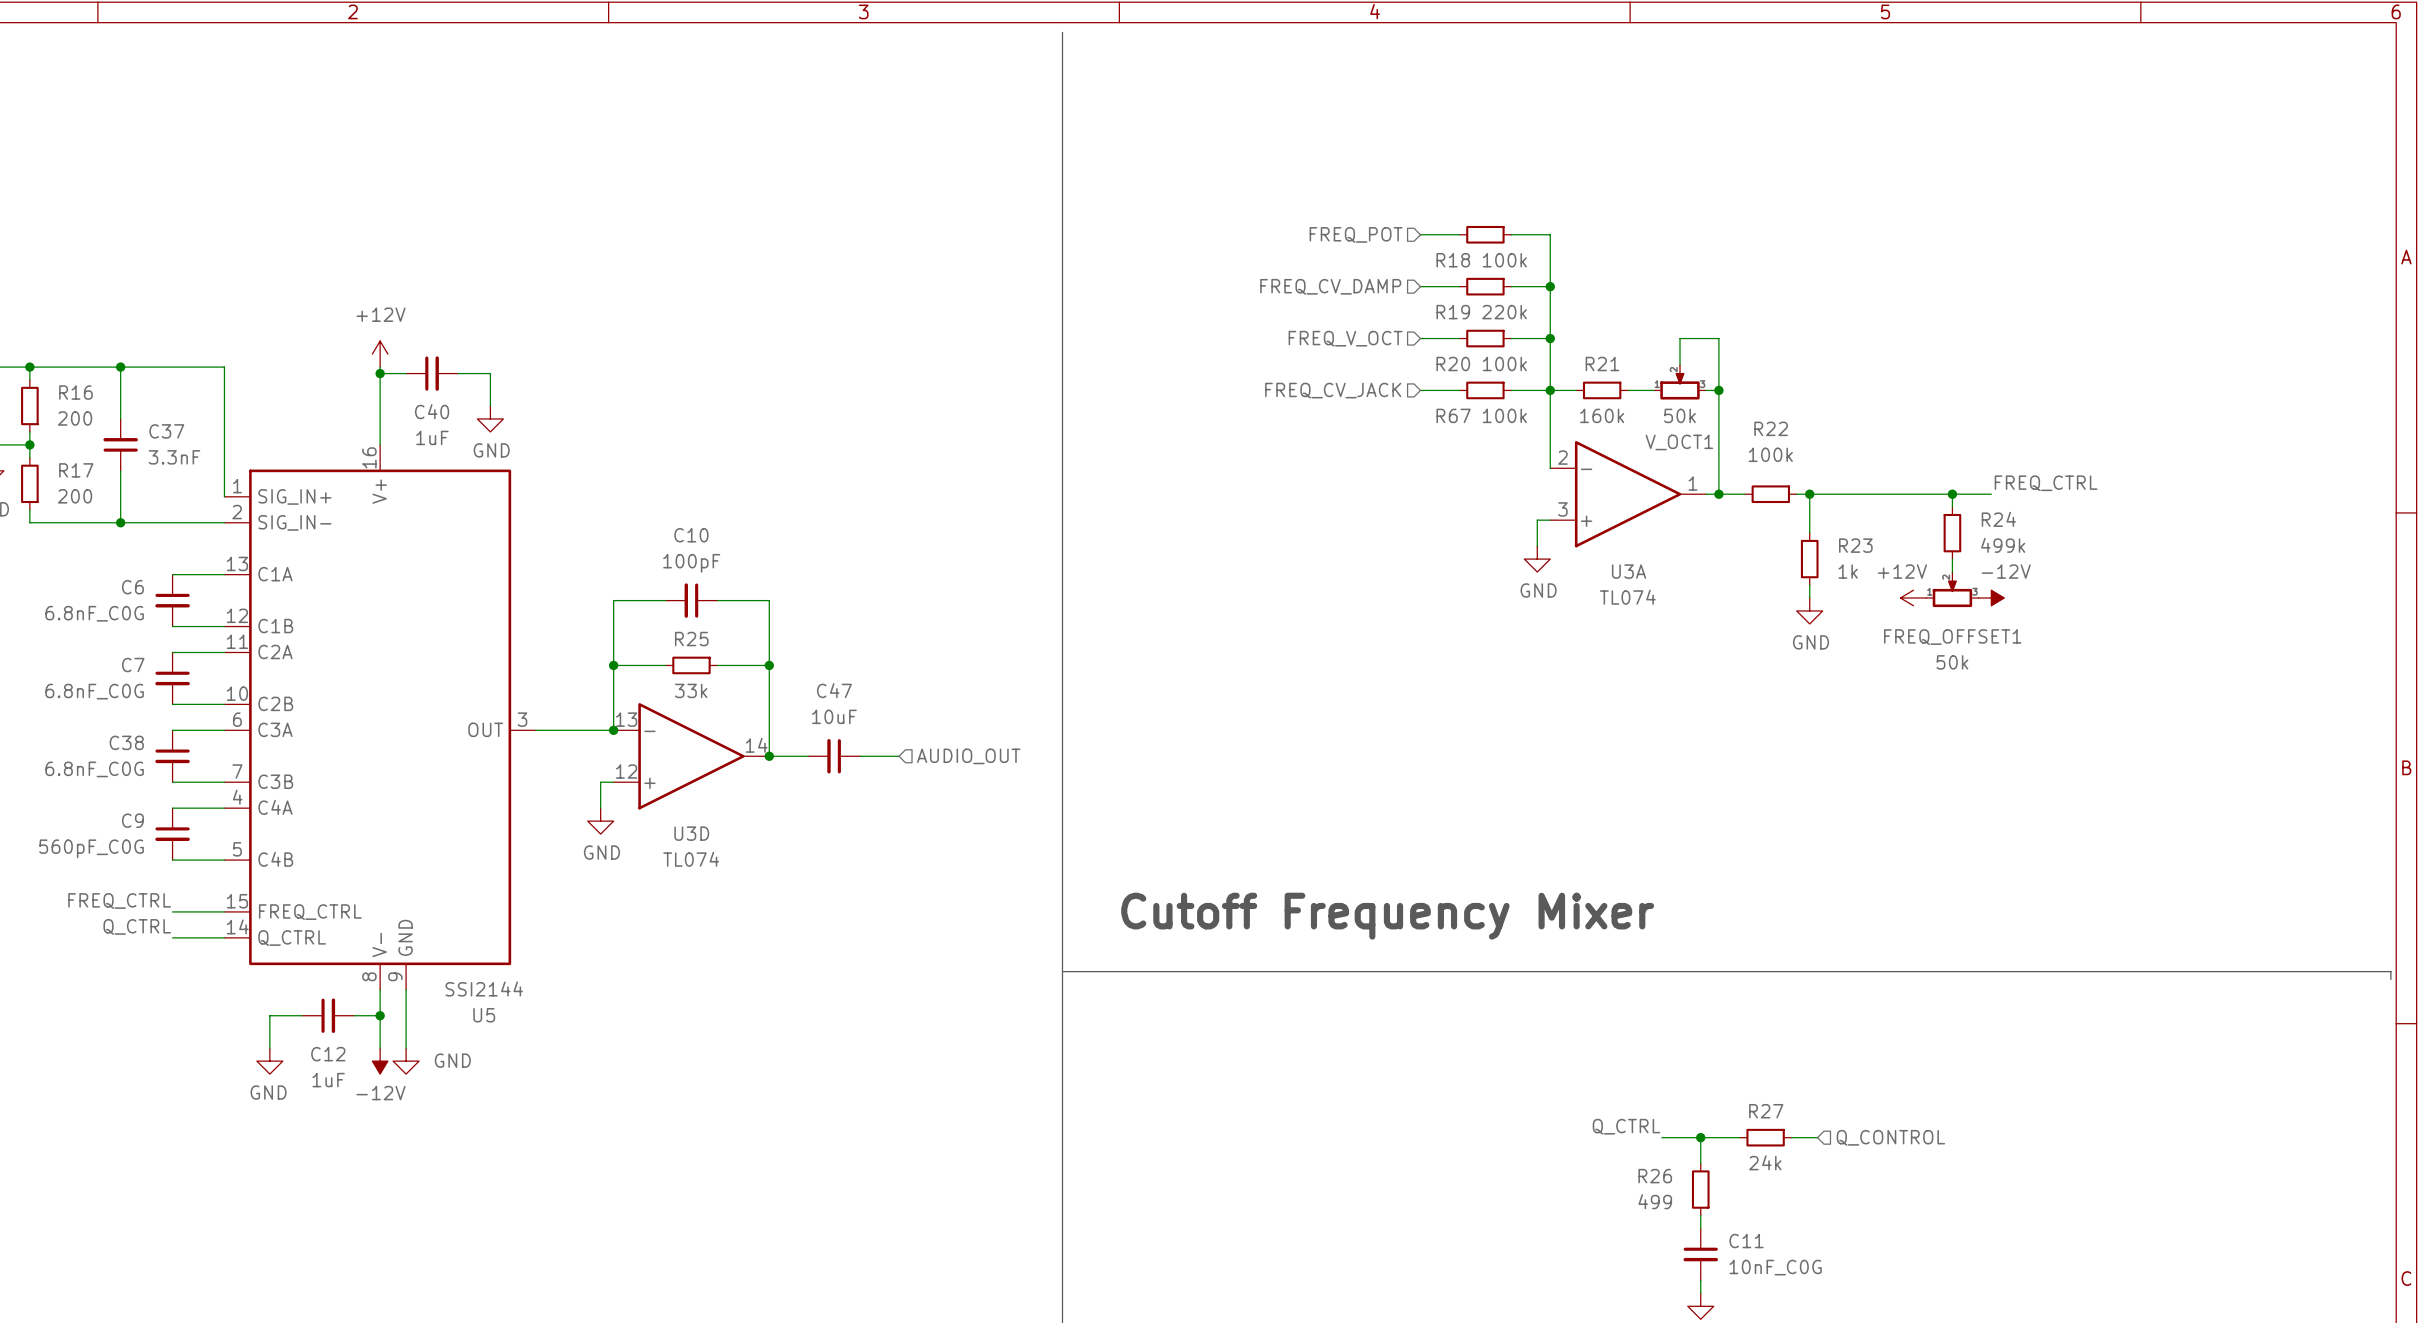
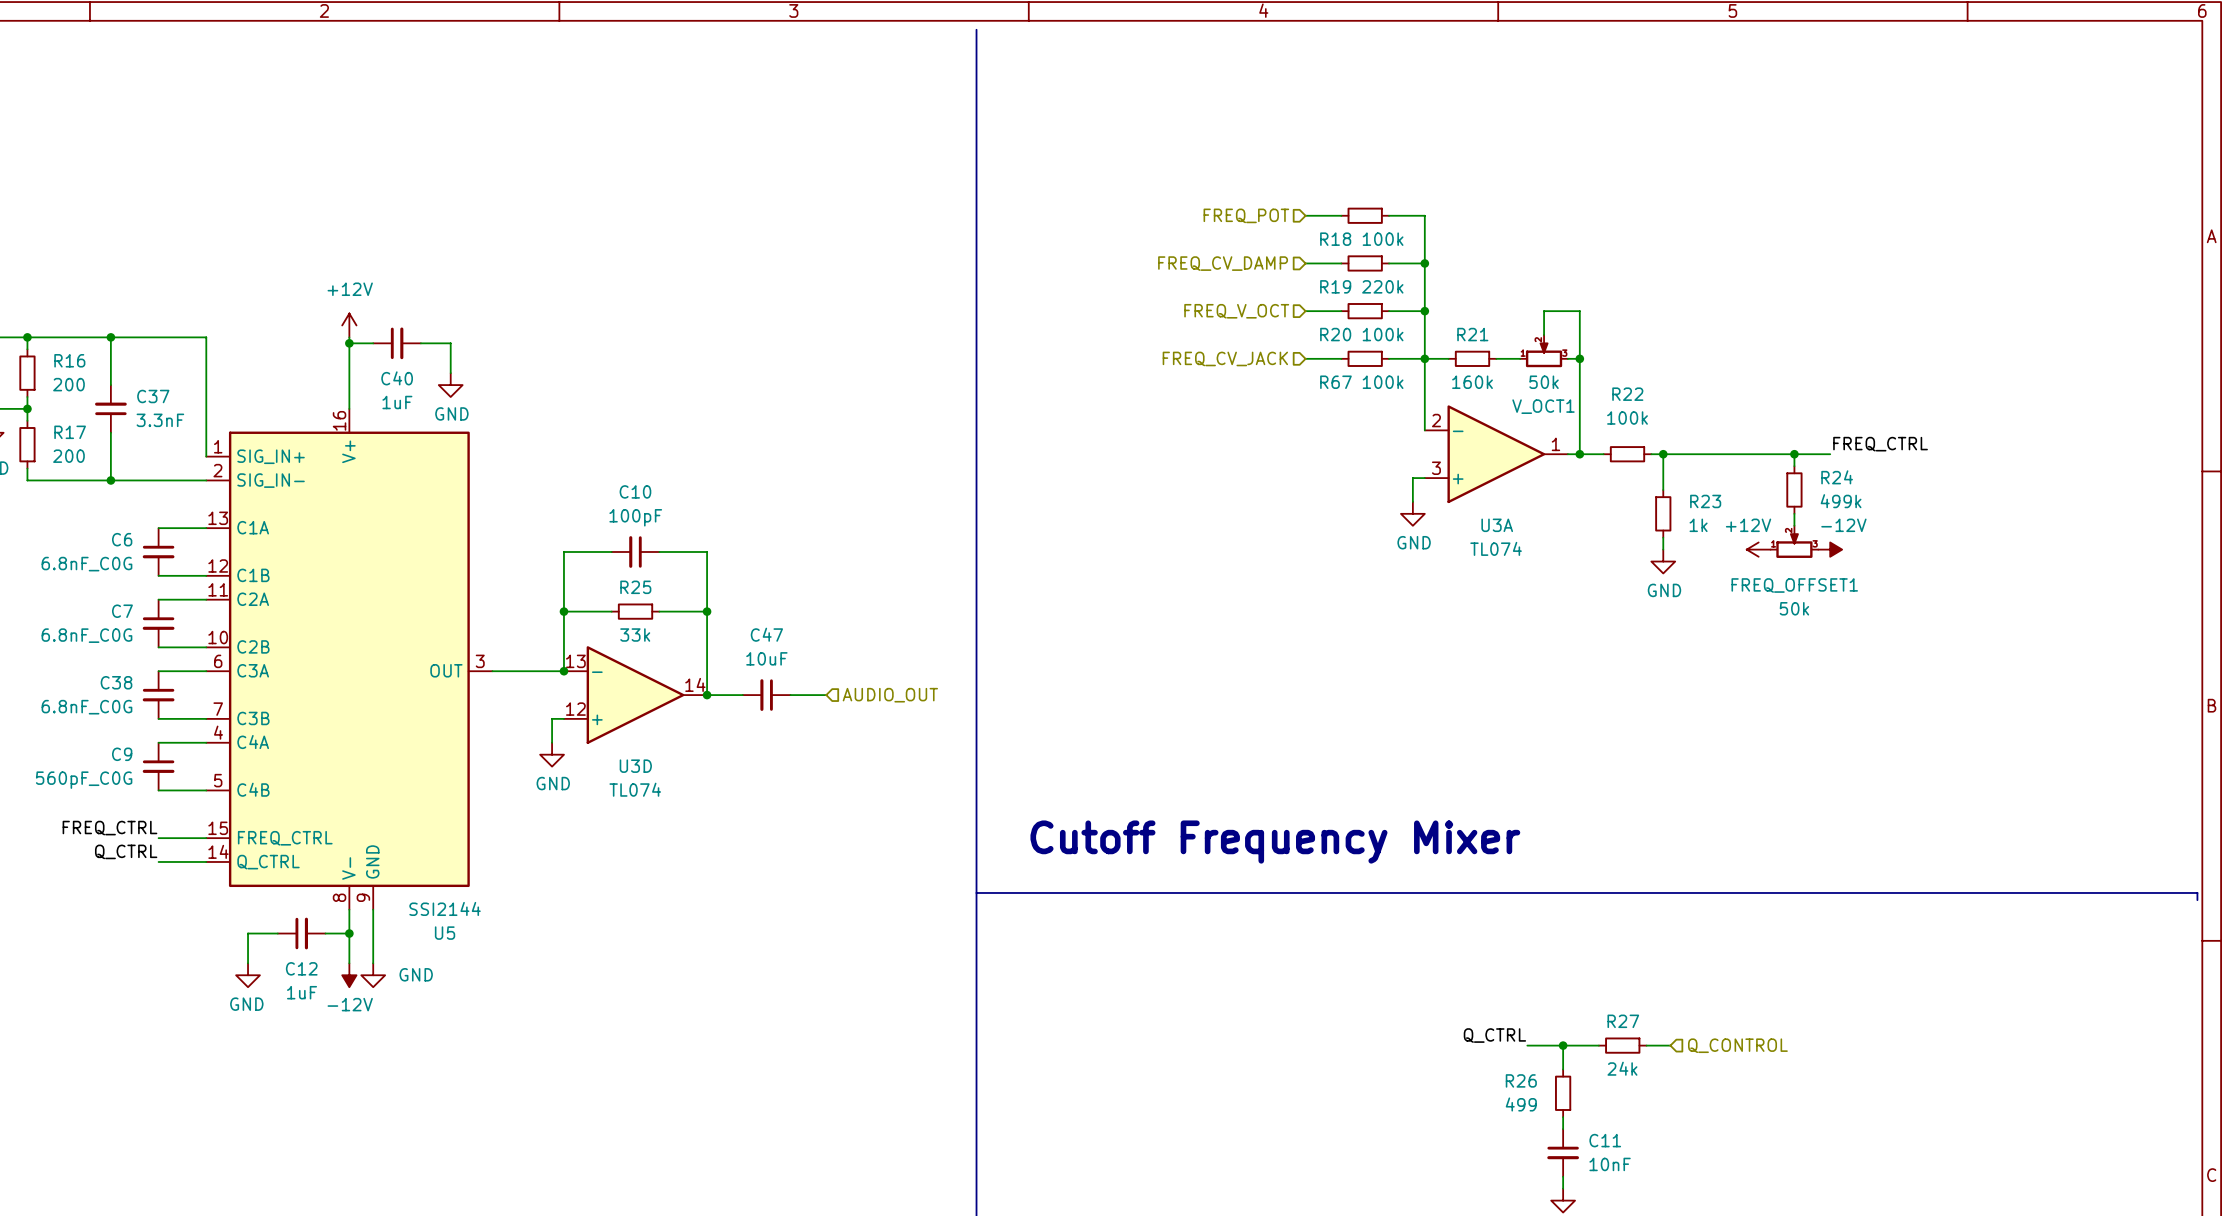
C11 value: 10nF_C0G (1775, 1267) -> 10nF (1610, 1164)

